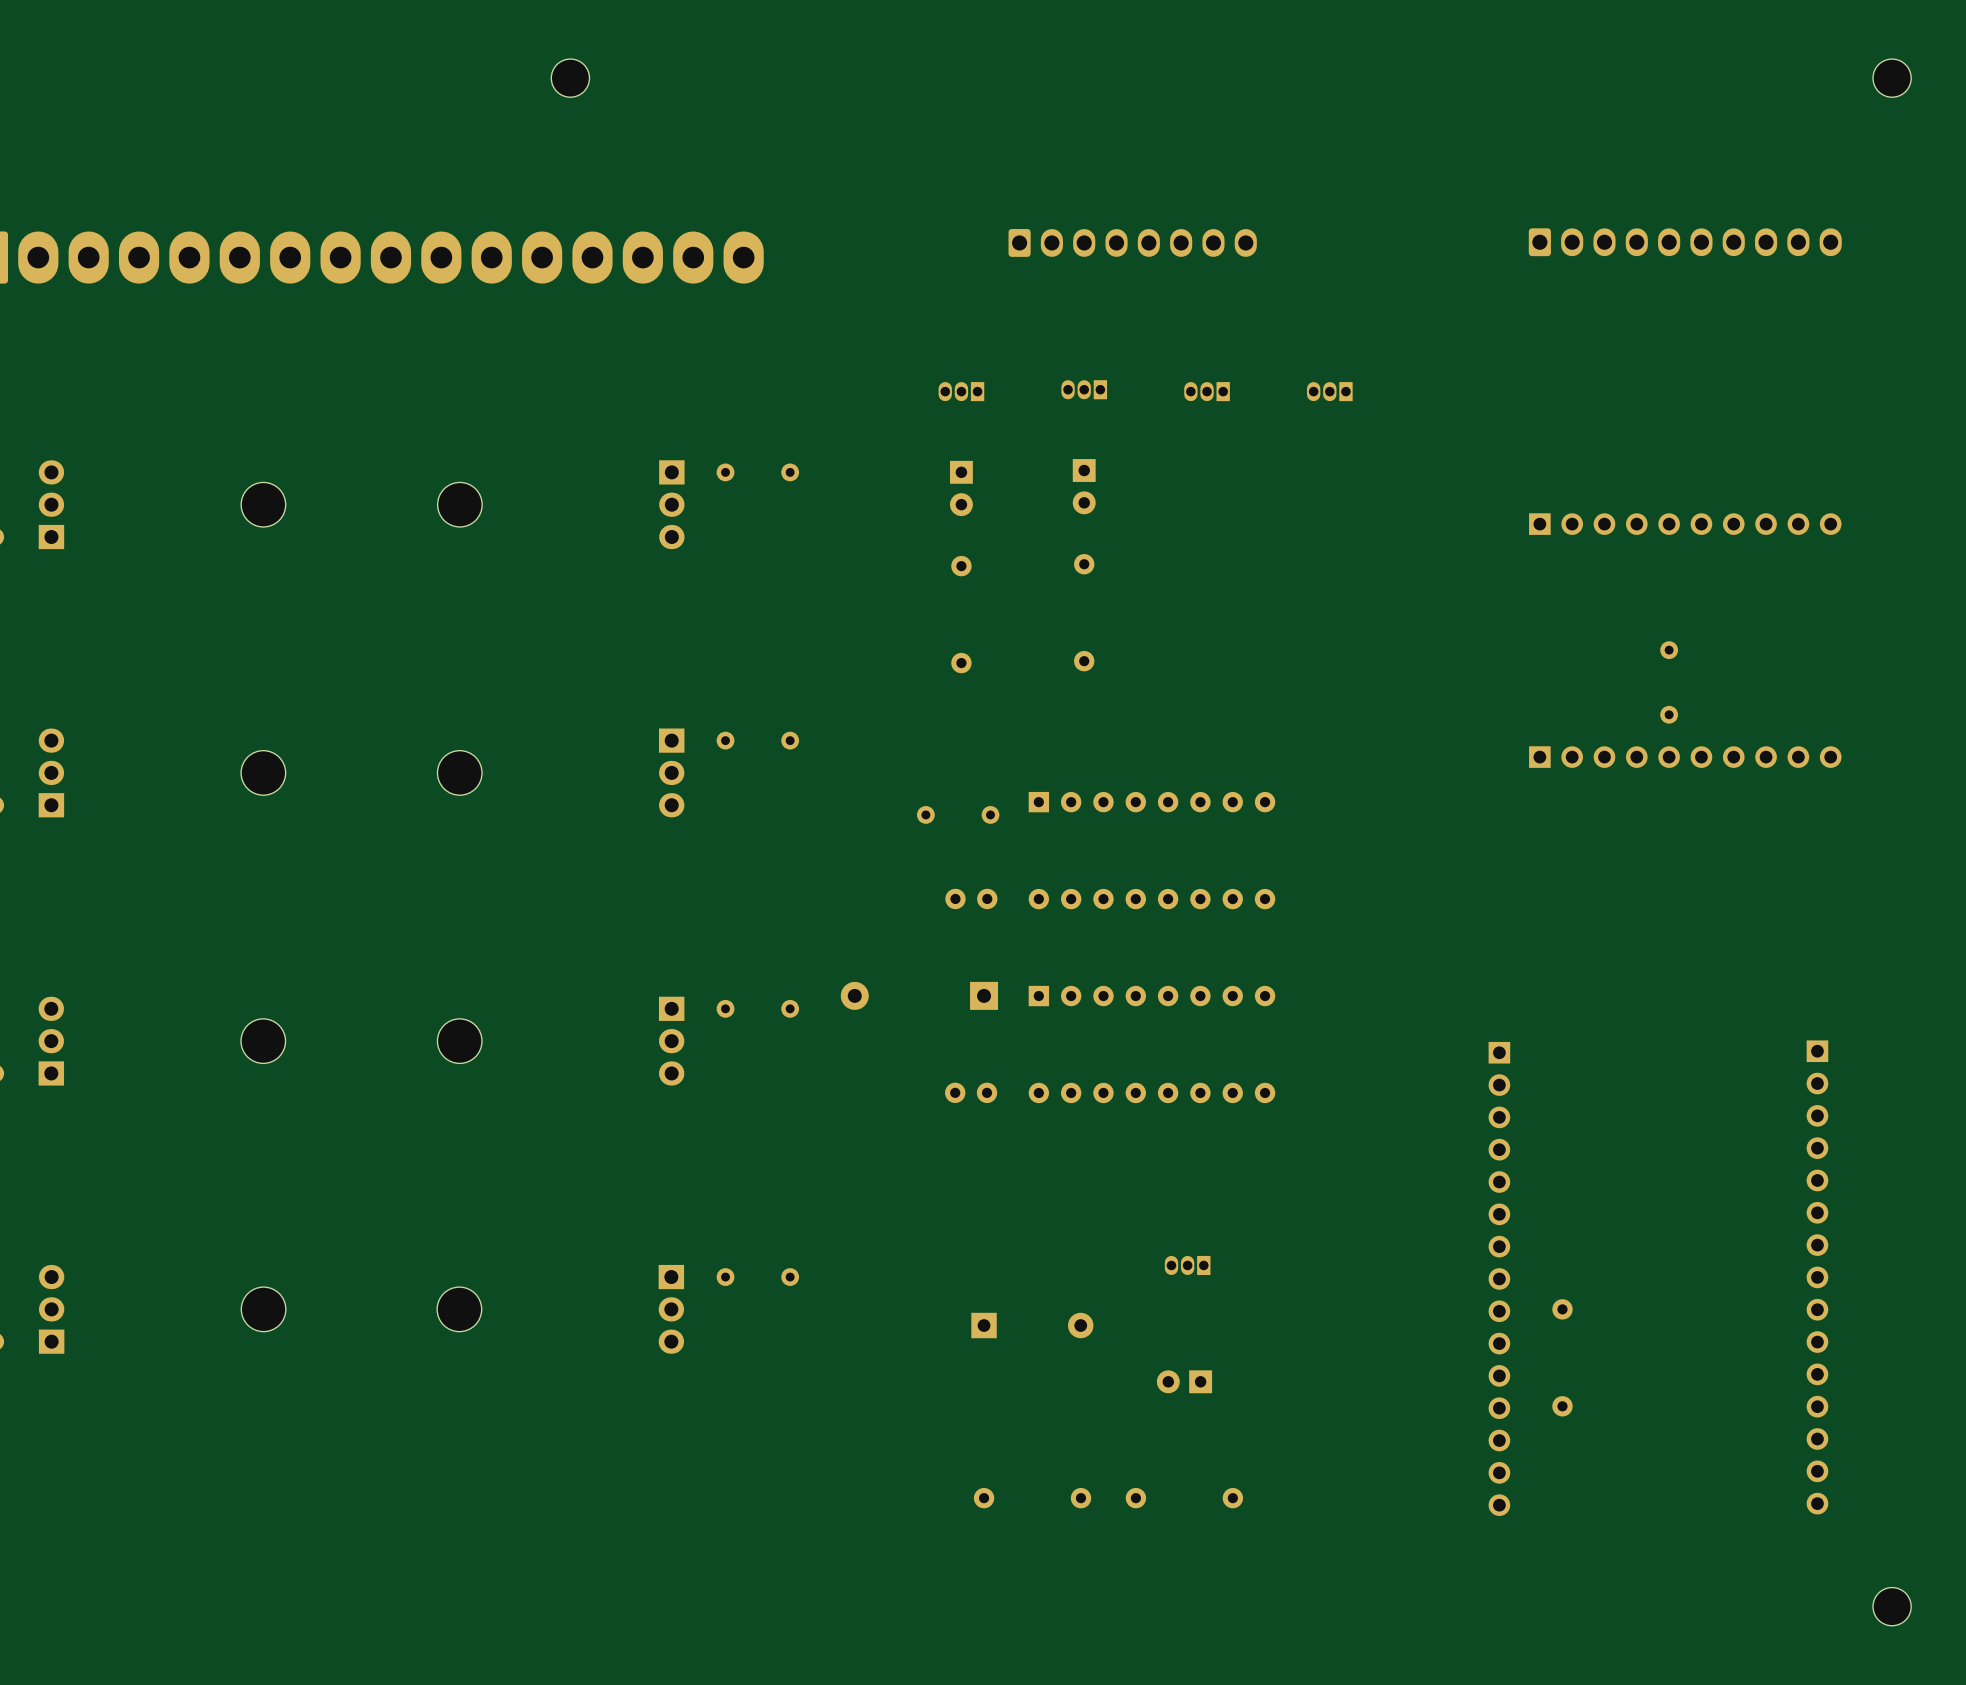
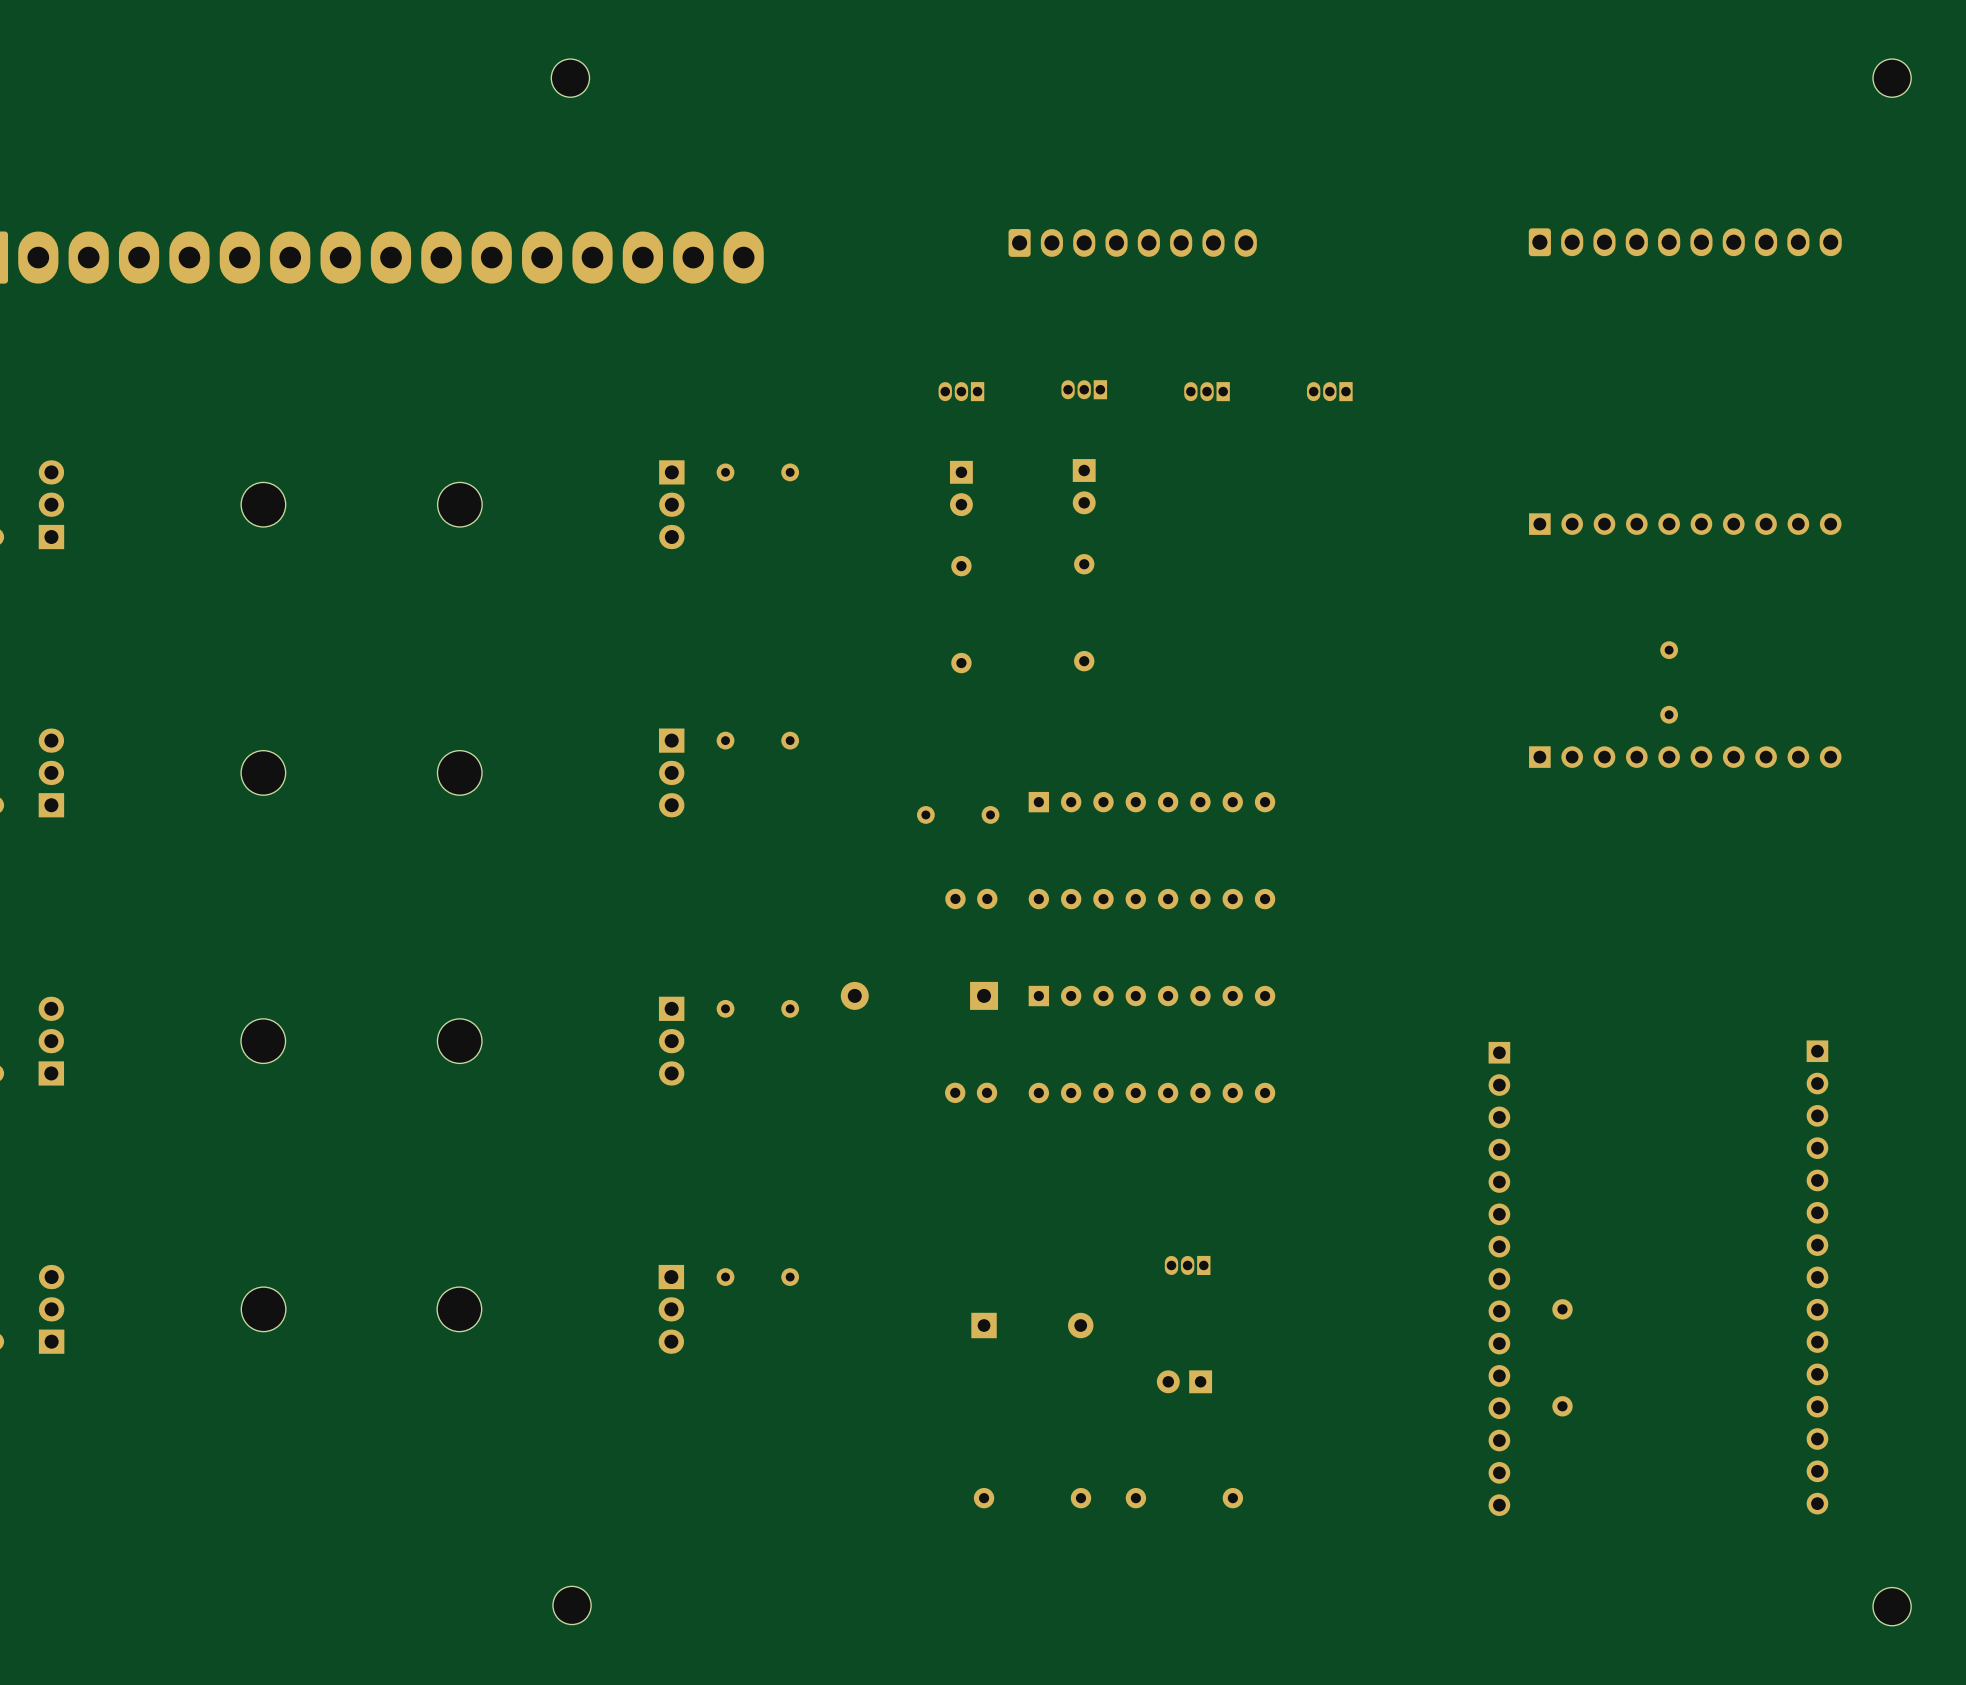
part: none -> (572, 1605)

